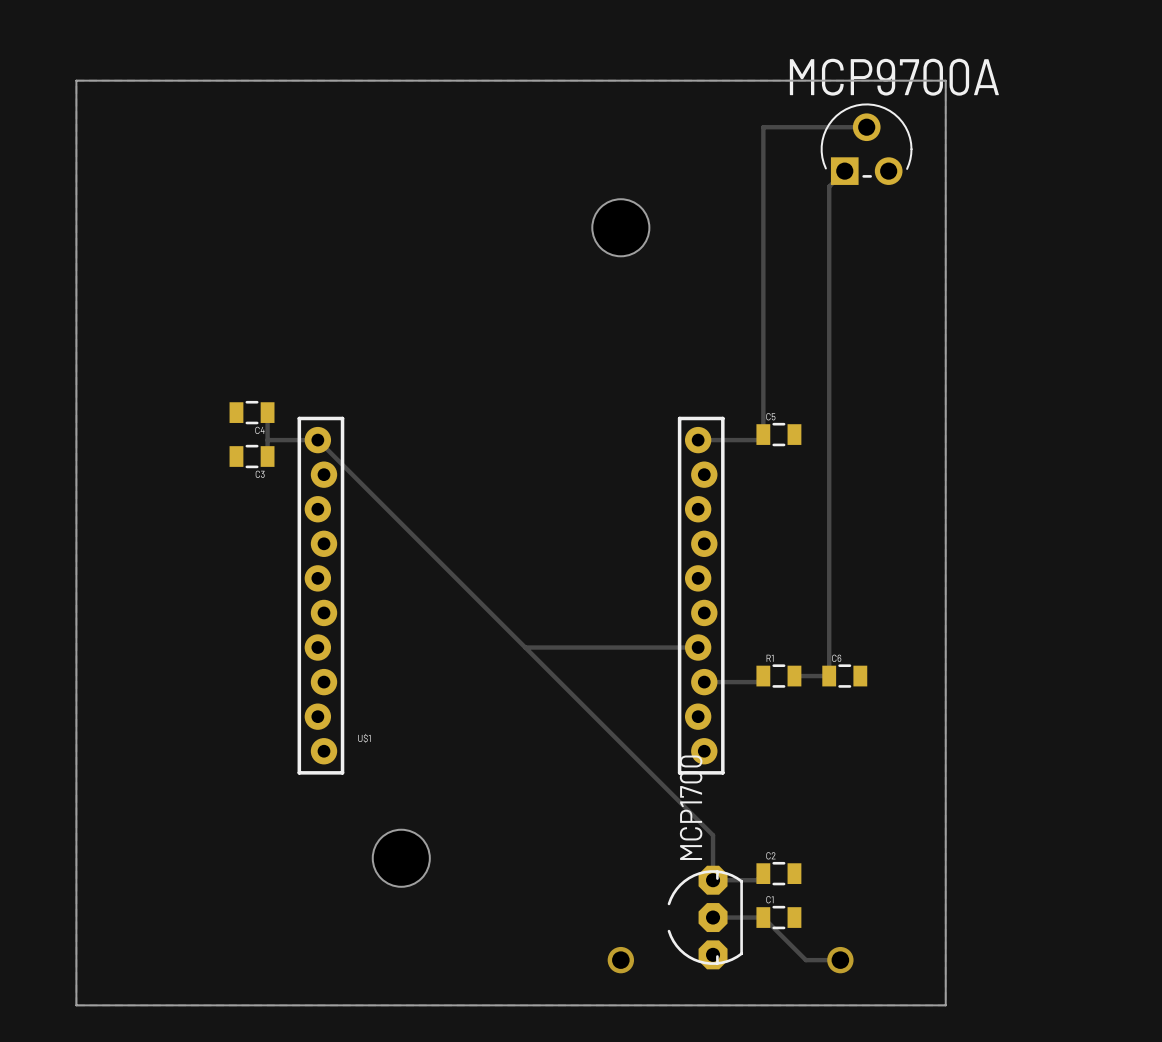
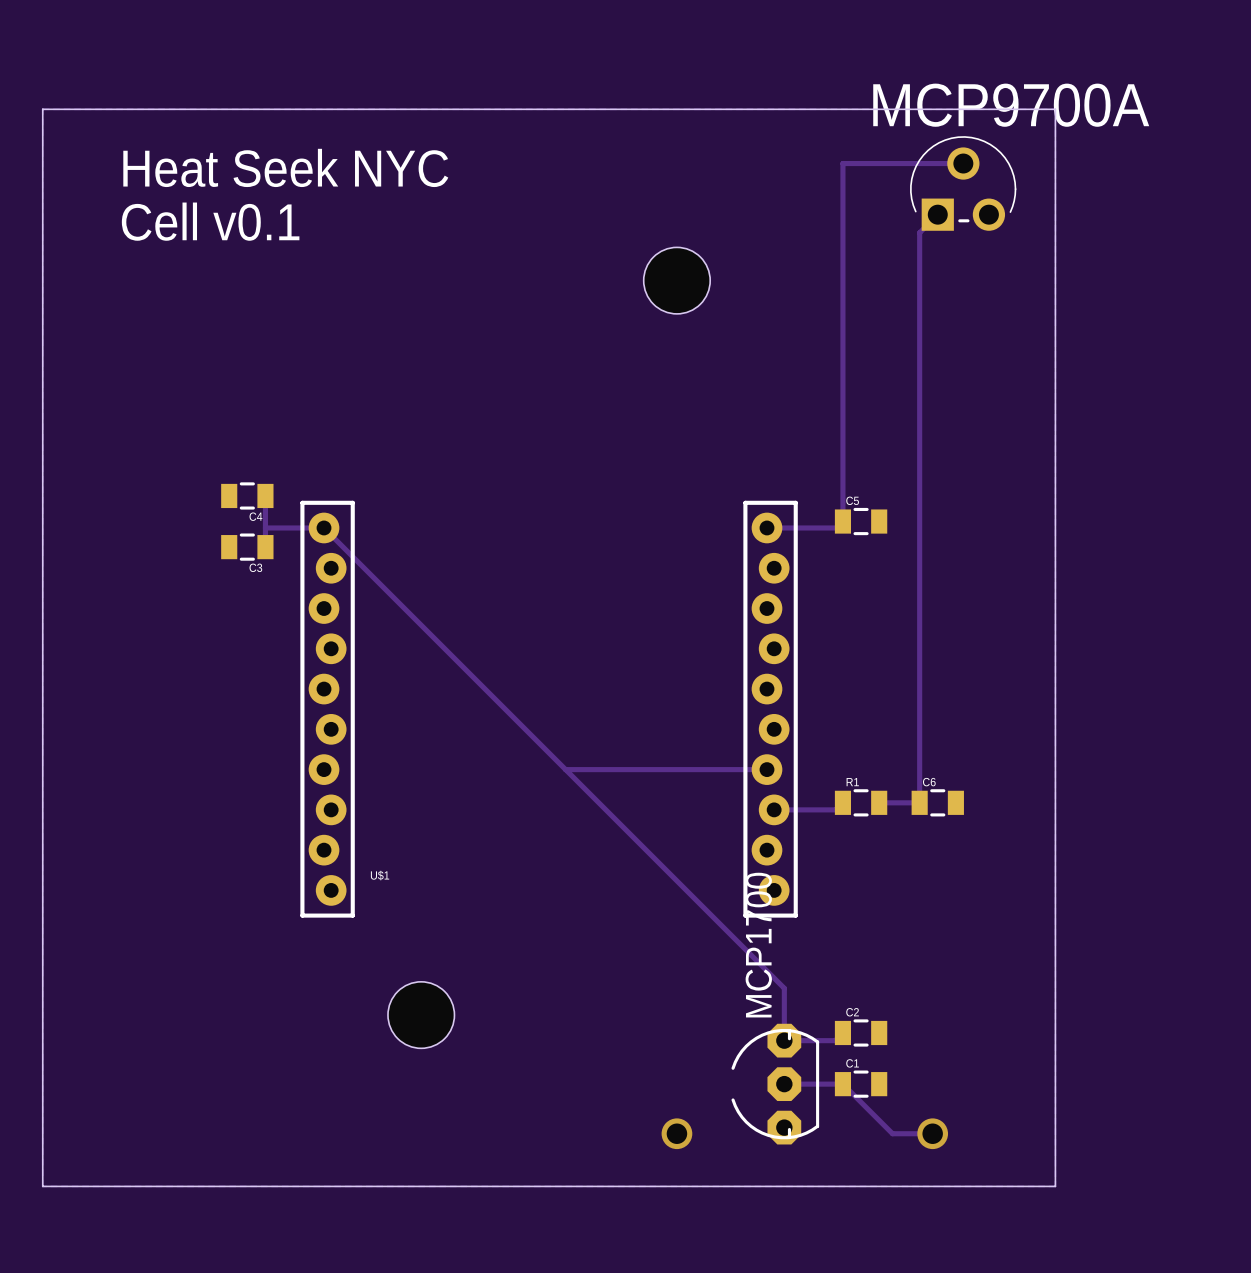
text: none -> Heat Seek NYC (285, 167)
text: none -> Cell v0.1 (210, 221)

